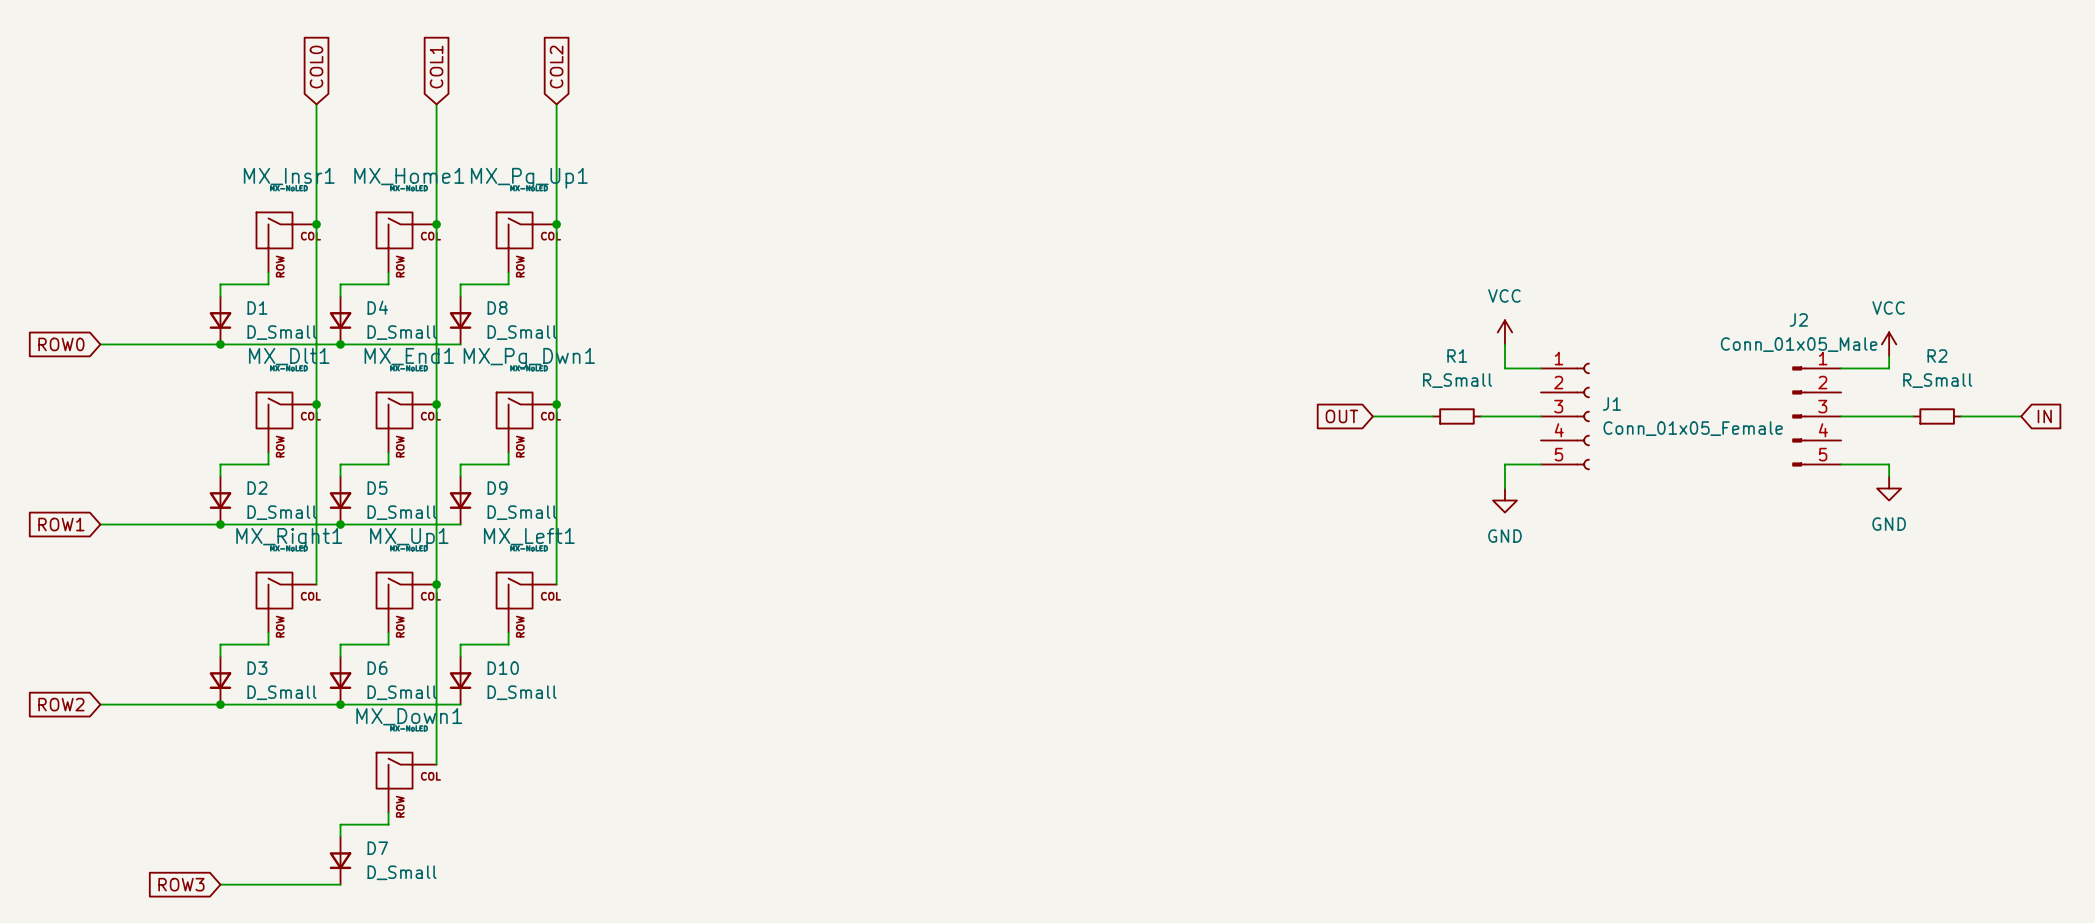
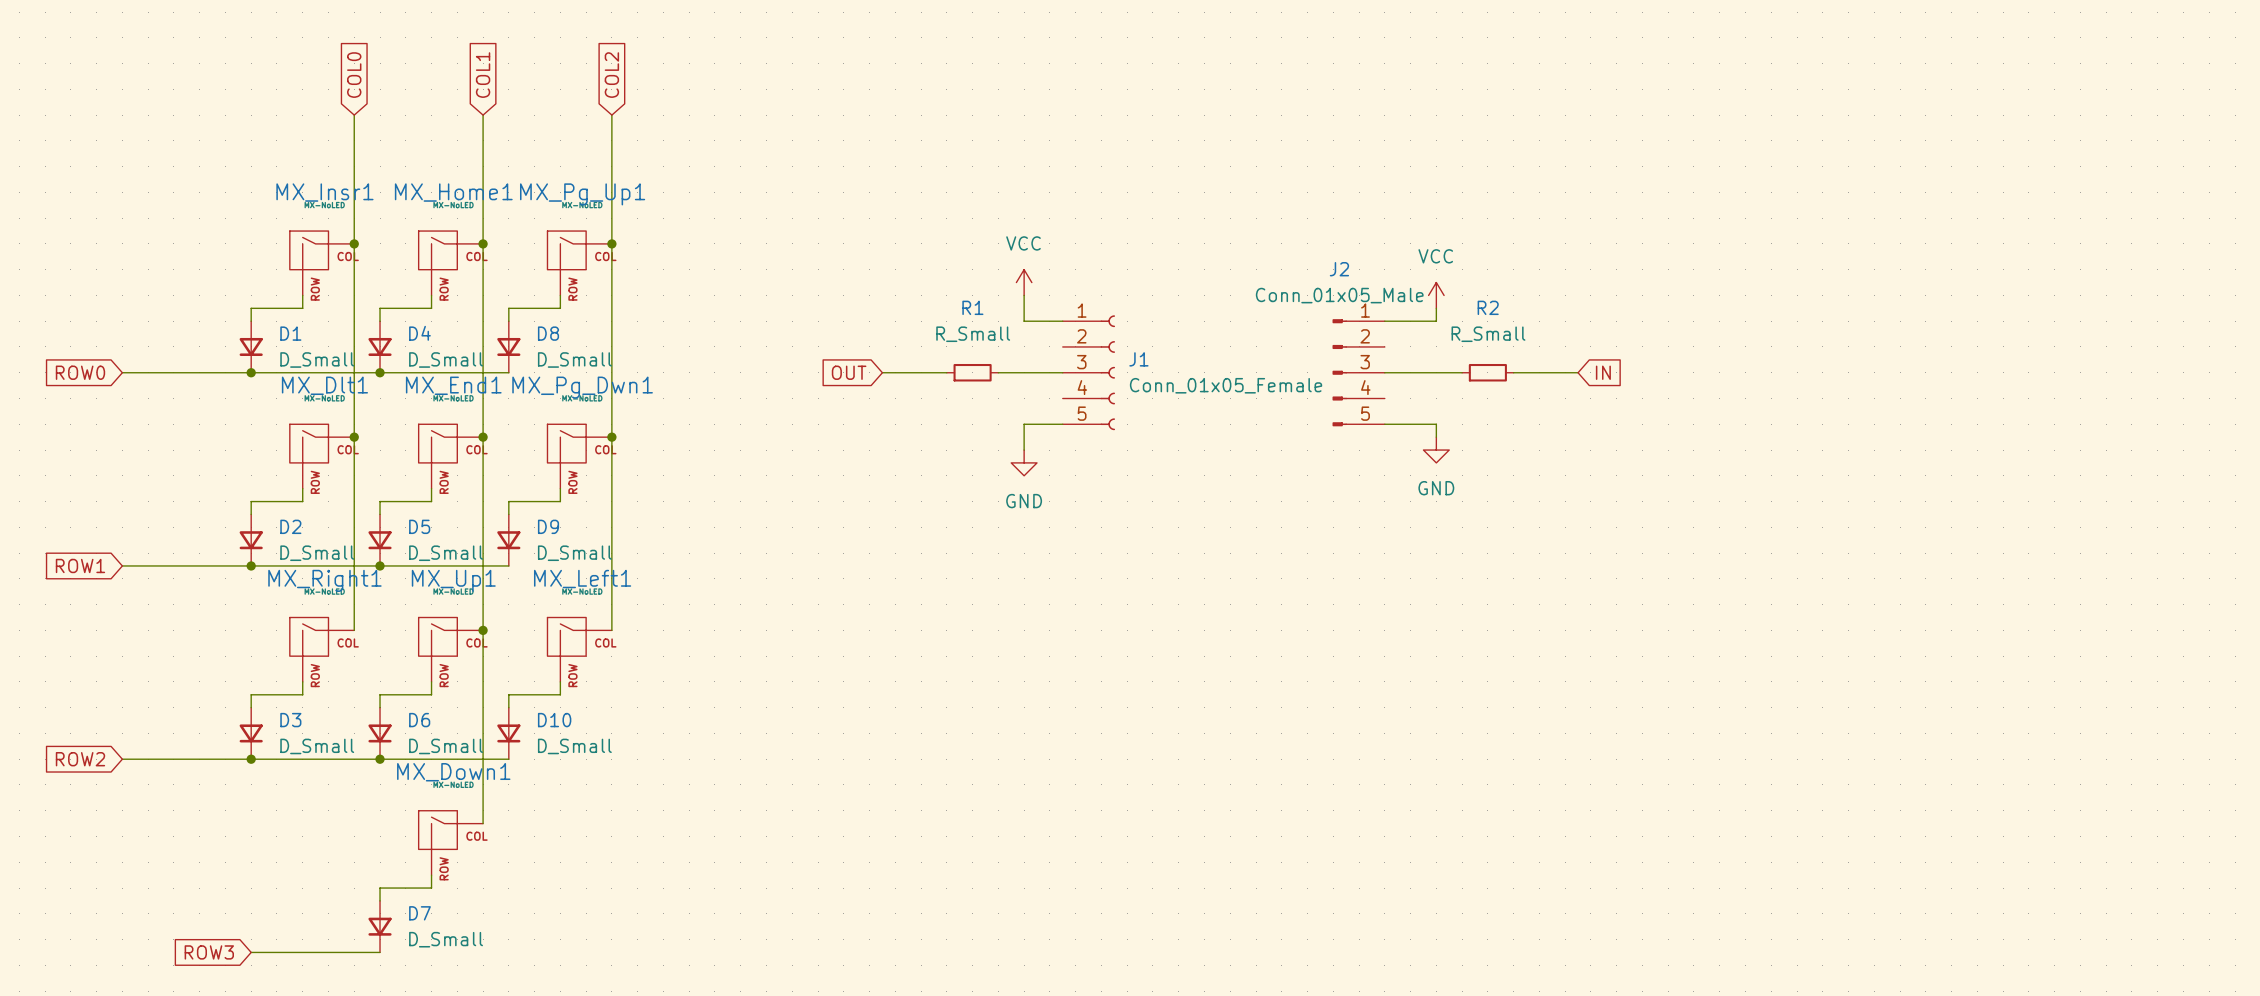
power symbol: none -> VCC (1024, 282)
wire: none -> (1024, 295) (1024, 321) (1062, 321)
wire: none -> (1436, 308) (1436, 321) (1384, 321)
power symbol position: VCC (1504, 332) -> VCC (1436, 295)
global label: none -> OUT (849, 372)
wire: none -> (882, 372) (946, 372)
wire: none -> (998, 372) (1062, 372)
wire: none -> (1384, 372) (1462, 372)
global label: none -> IN (1603, 372)
wire: (1504, 344) (1504, 368) (1540, 368) -> none
power symbol: VCC (1889, 344) -> none
wire: (1889, 356) (1889, 368) (1841, 368) -> none
wire: none -> (1062, 424) (1024, 424) (1024, 450)
wire: none -> (1384, 424) (1436, 424) (1436, 437)
global label: OUT (1341, 416) -> none
wire: (1372, 416) (1432, 416) -> (1513, 372) (1578, 372)
R1 position: (1456, 416) -> (972, 372)
wire: (1480, 416) (1540, 416) -> none
J1 position: (1565, 416) -> (1088, 372)
J2 position: (1816, 416) -> (1358, 372)
wire: (1841, 416) (1913, 416) -> none
R2 position: (1937, 416) -> (1487, 372)
wire: (1961, 416) (2021, 416) -> none
global label: IN (2044, 416) -> none
power symbol: none -> GND (1024, 462)
wire: (1540, 464) (1504, 464) (1504, 488) -> none
wire: (1841, 464) (1889, 464) (1889, 476) -> none
power symbol: GND (1889, 488) -> none
power symbol position: GND (1504, 500) -> GND (1436, 450)

